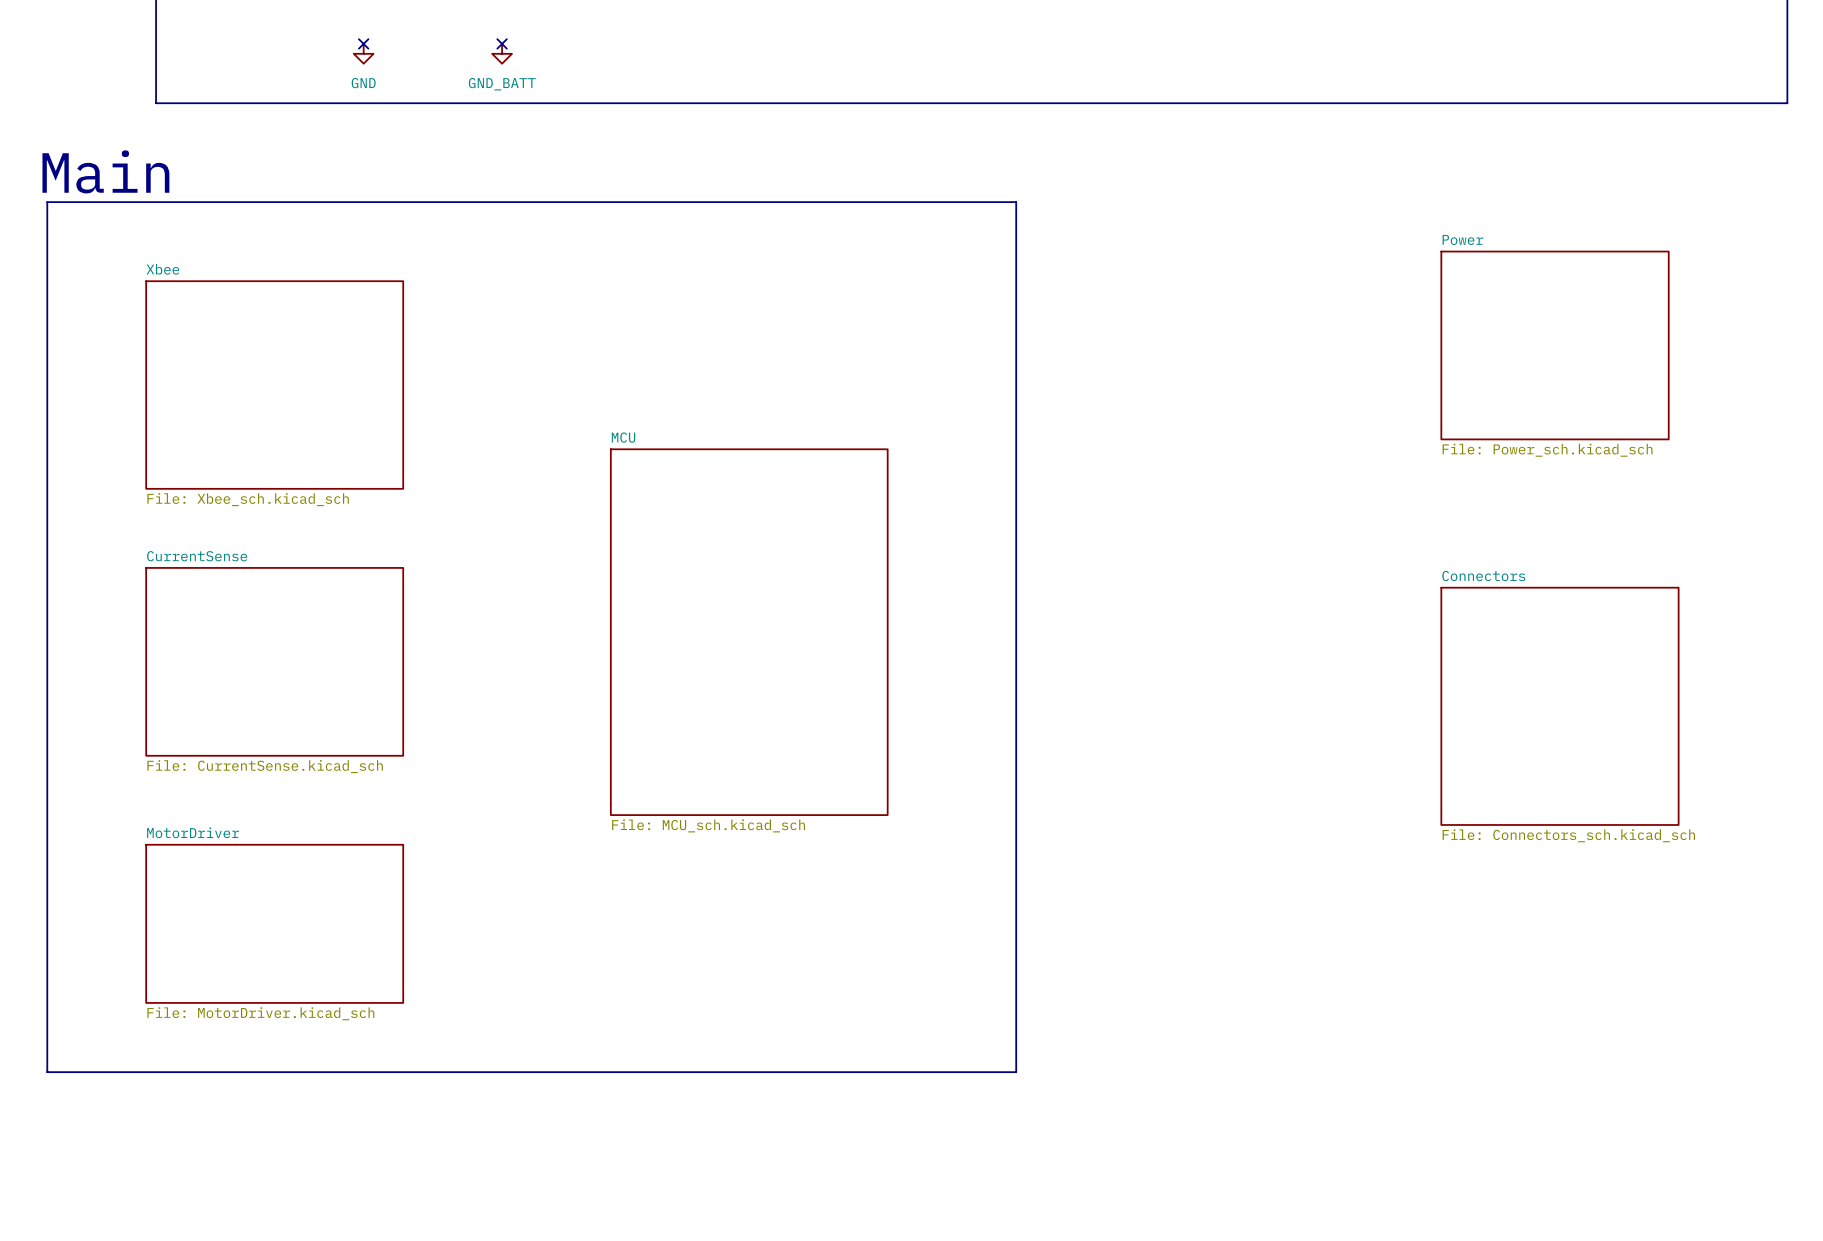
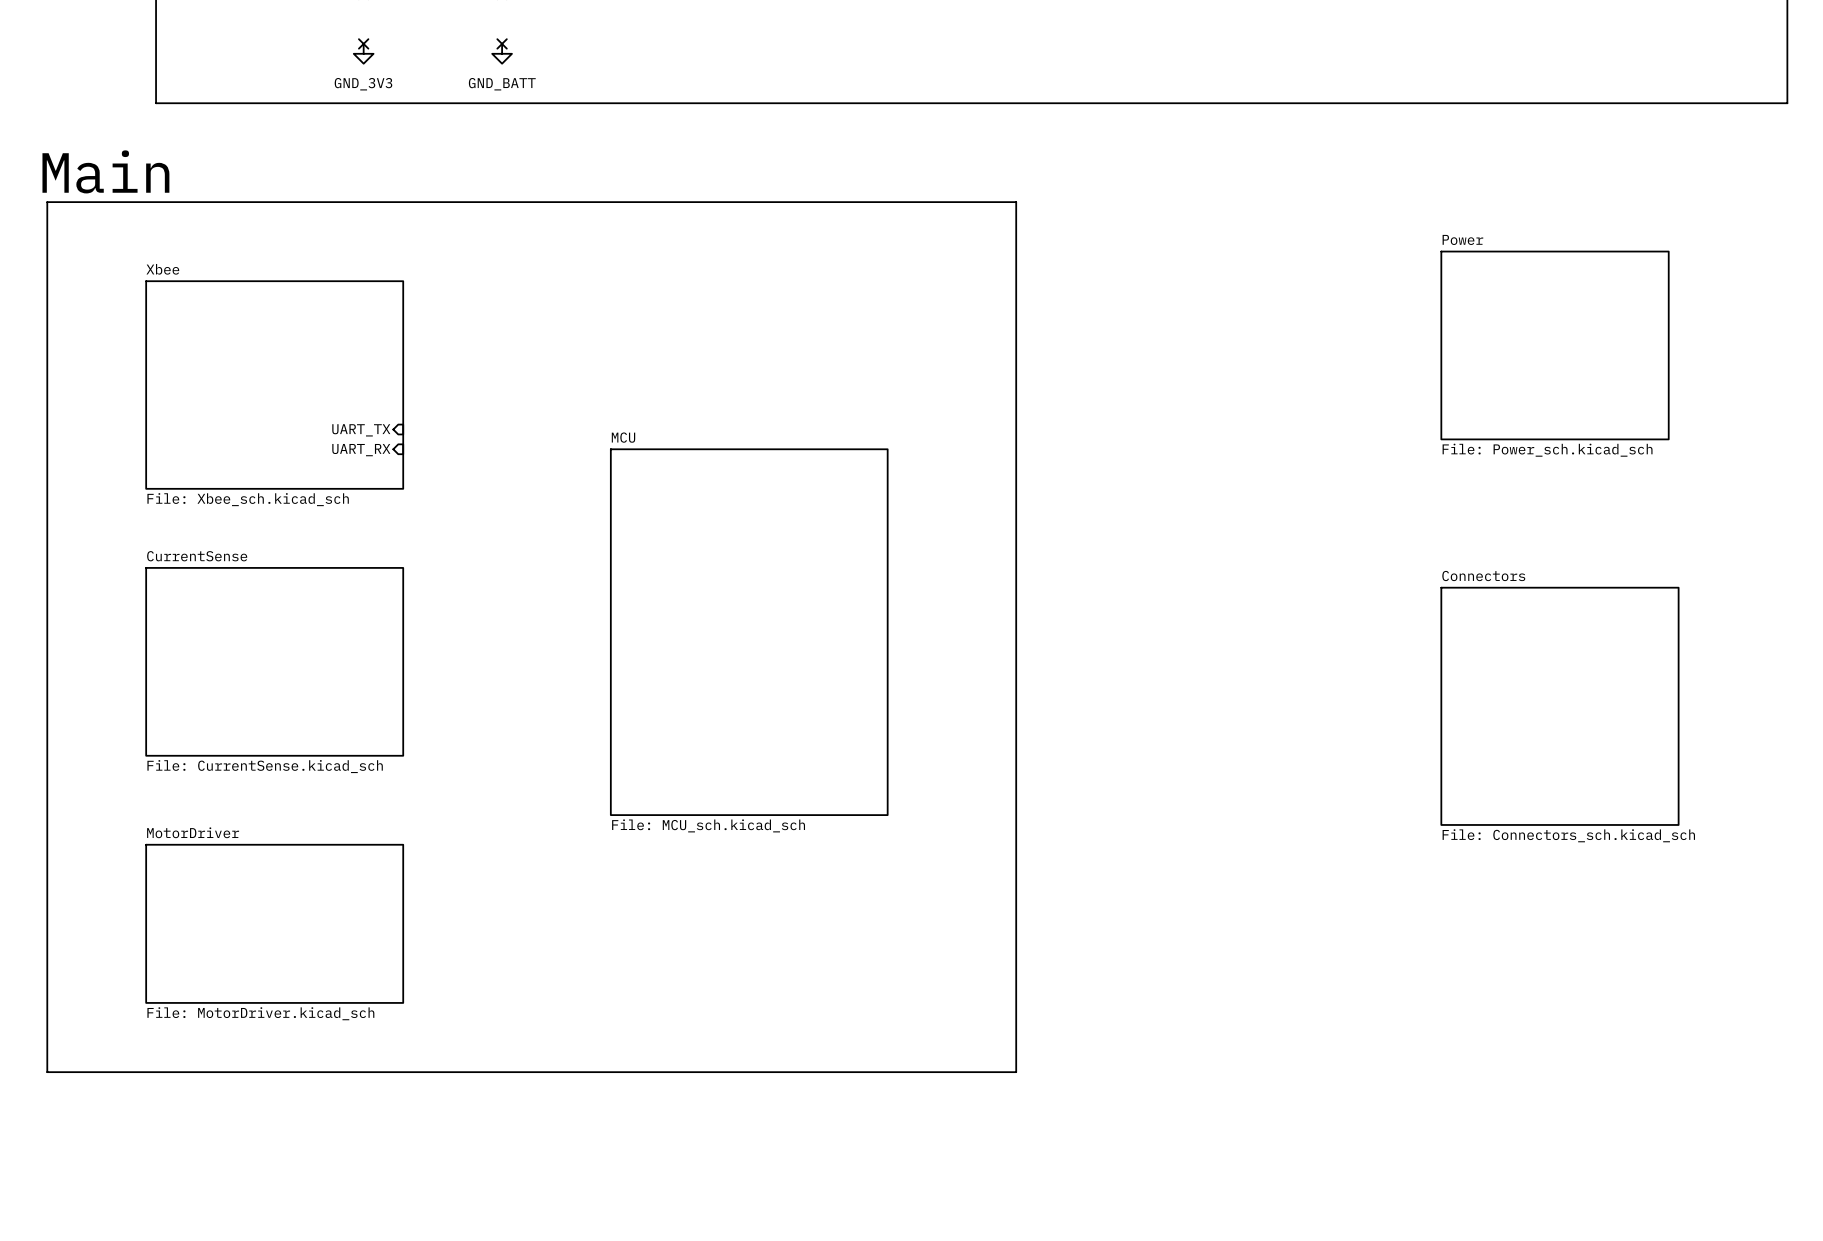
power symbol: GND (363, 53) -> GND_3V3 (363, 53)
sheet pin: none -> UART_TX (361, 430)
sheet pin: none -> UART_RX (361, 450)

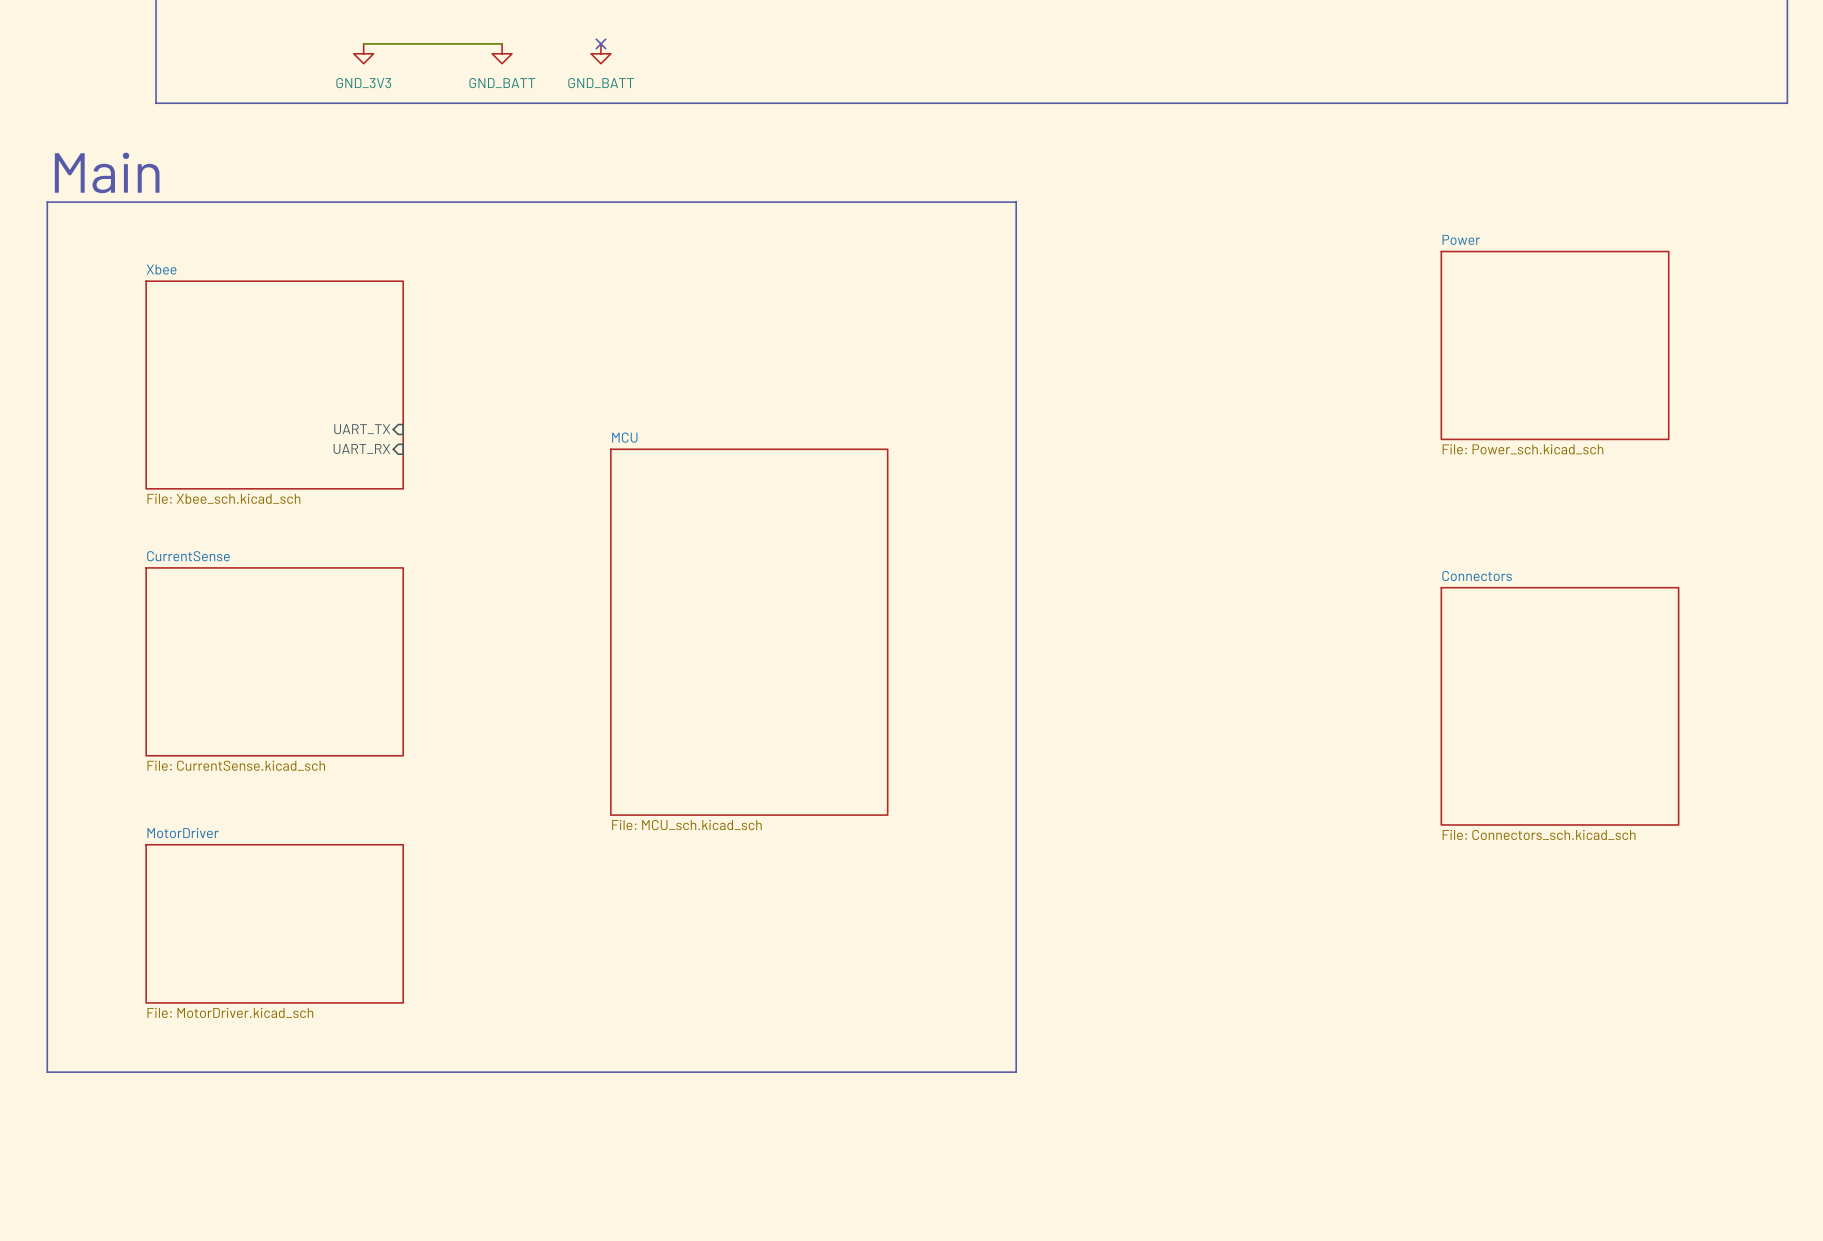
wire: none -> (363, 43) (502, 43)
no-connect mark: (363, 43) -> none
no-connect mark: (502, 43) -> none
no-connect mark: none -> (600, 43)
power symbol: none -> GND_BATT (600, 53)

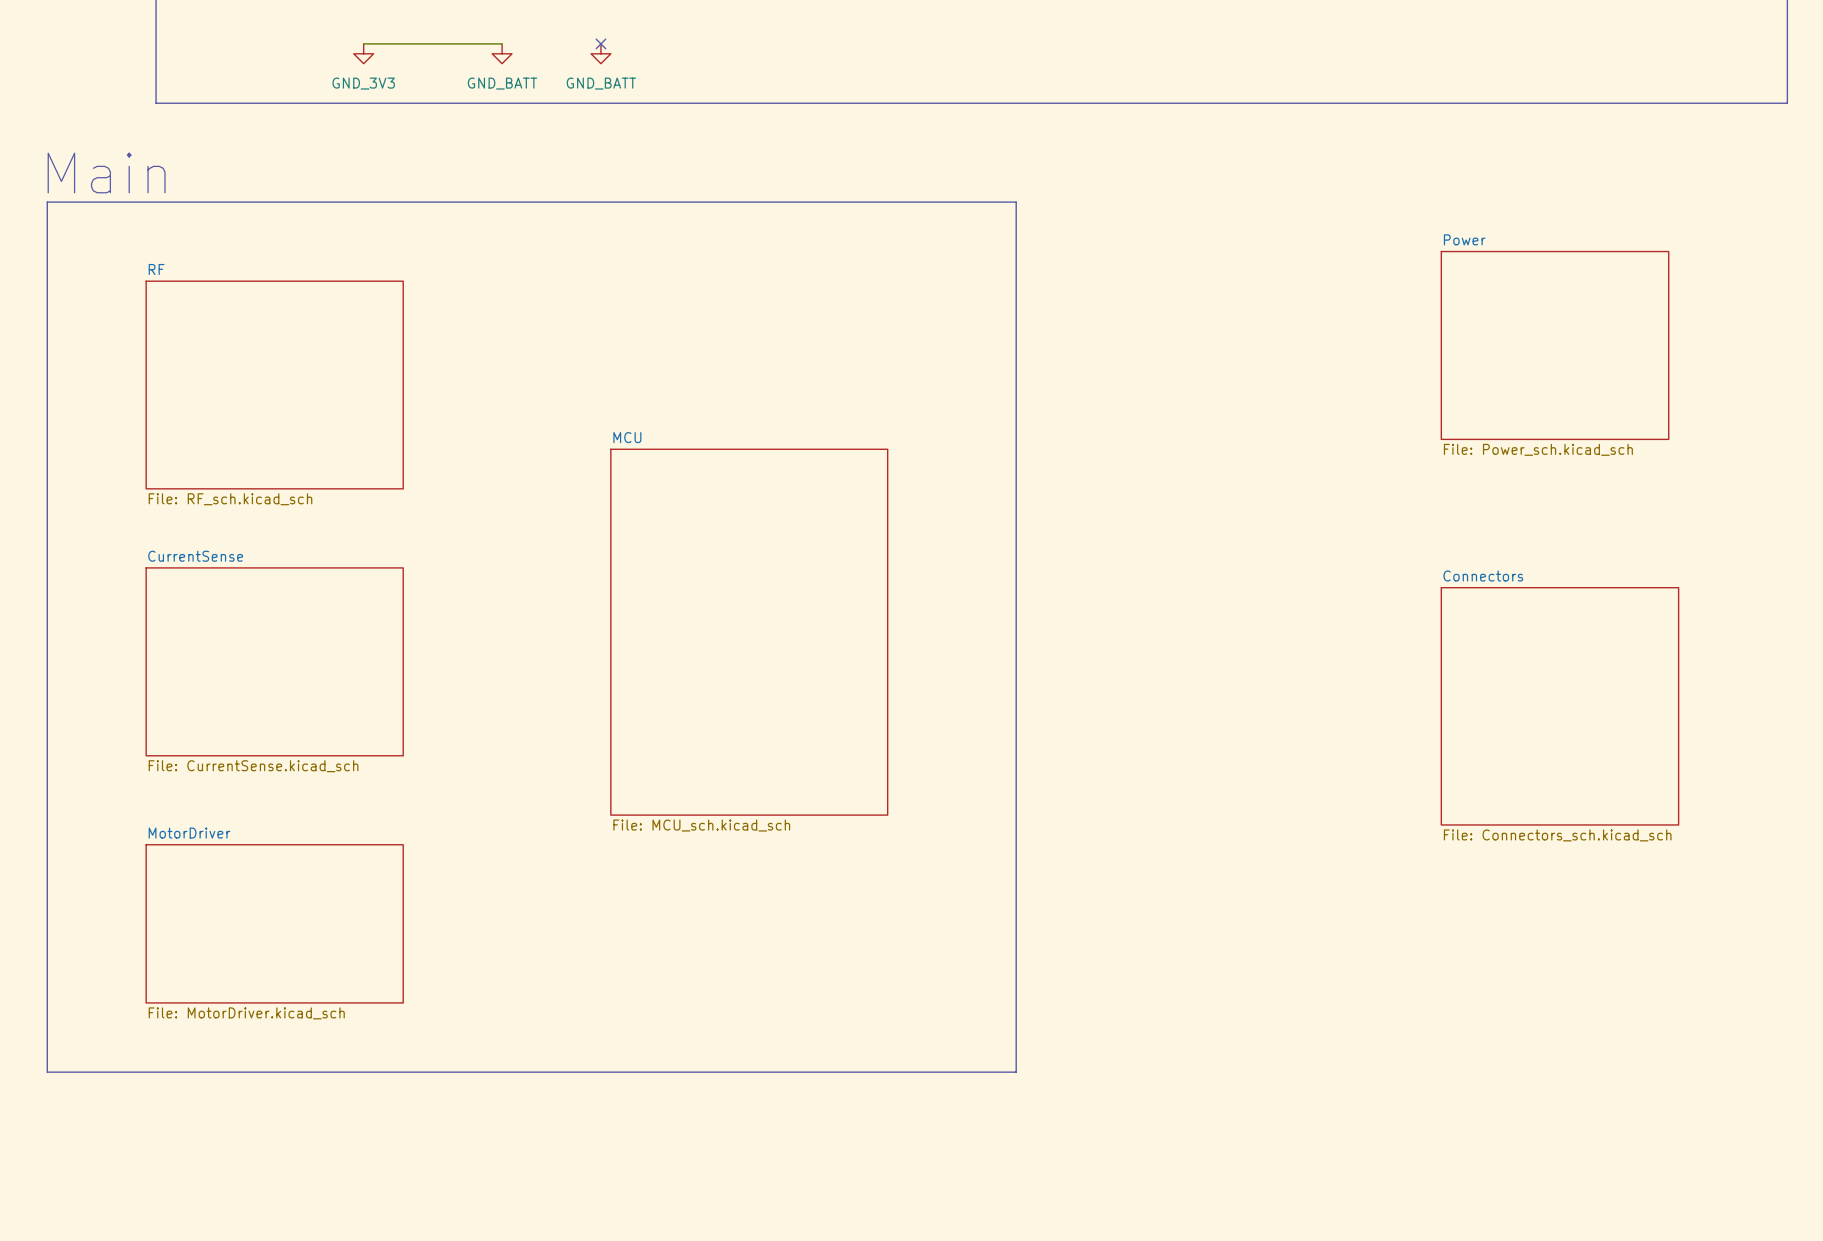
sheet Xbee name: Xbee (161, 269) -> RF (156, 269)
sheet pin: UART_TX (362, 429) -> none
sheet pin: UART_RX (361, 448) -> none
sheet Xbee value: File: Xbee_sch.kicad_sch (223, 498) -> File: RF_sch.kicad_sch (230, 499)

